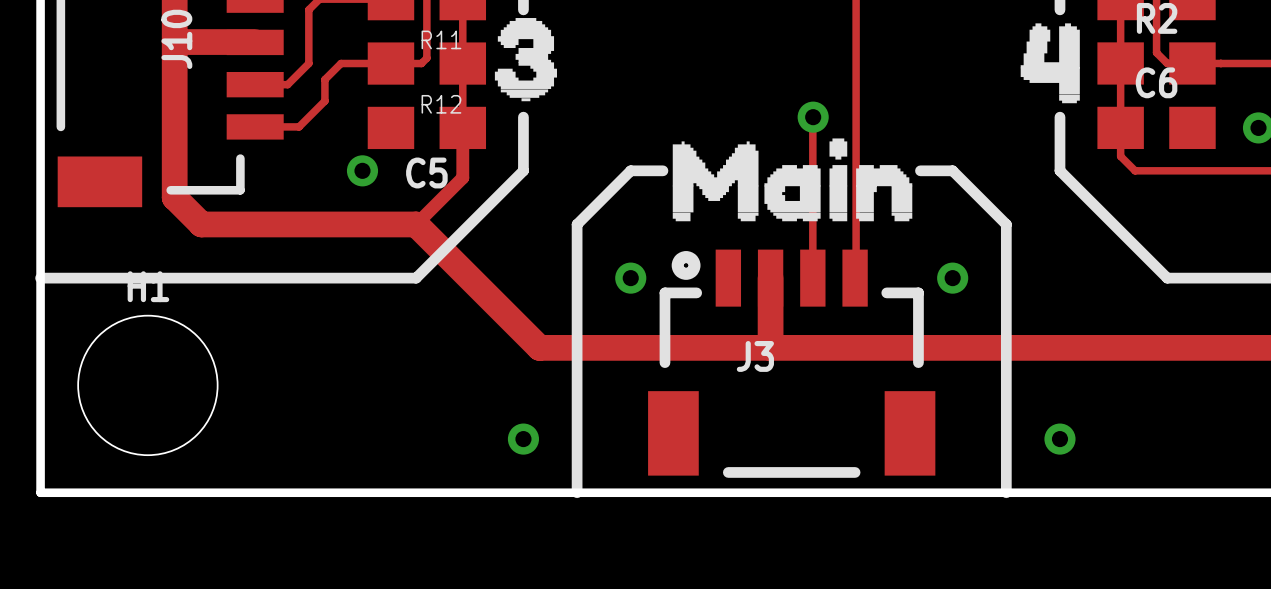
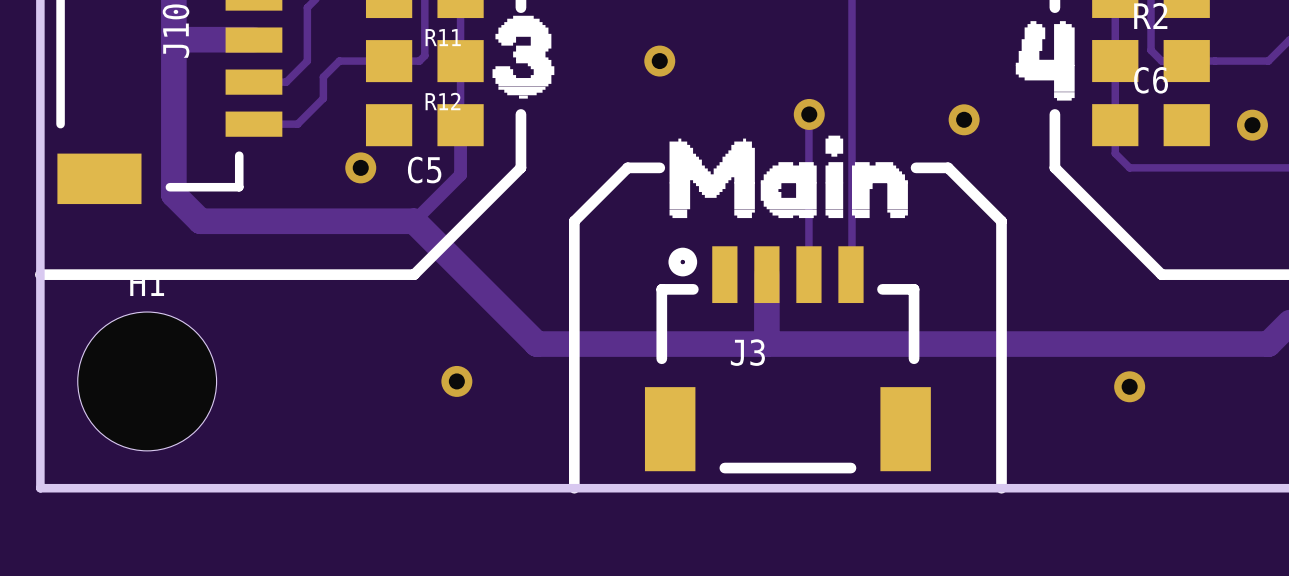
via: none -> (659, 61)
via: none -> (964, 119)
via: (630, 278) -> none
via: (952, 278) -> none
via position: (523, 439) -> (456, 381)
via position: (1059, 439) -> (1129, 386)

